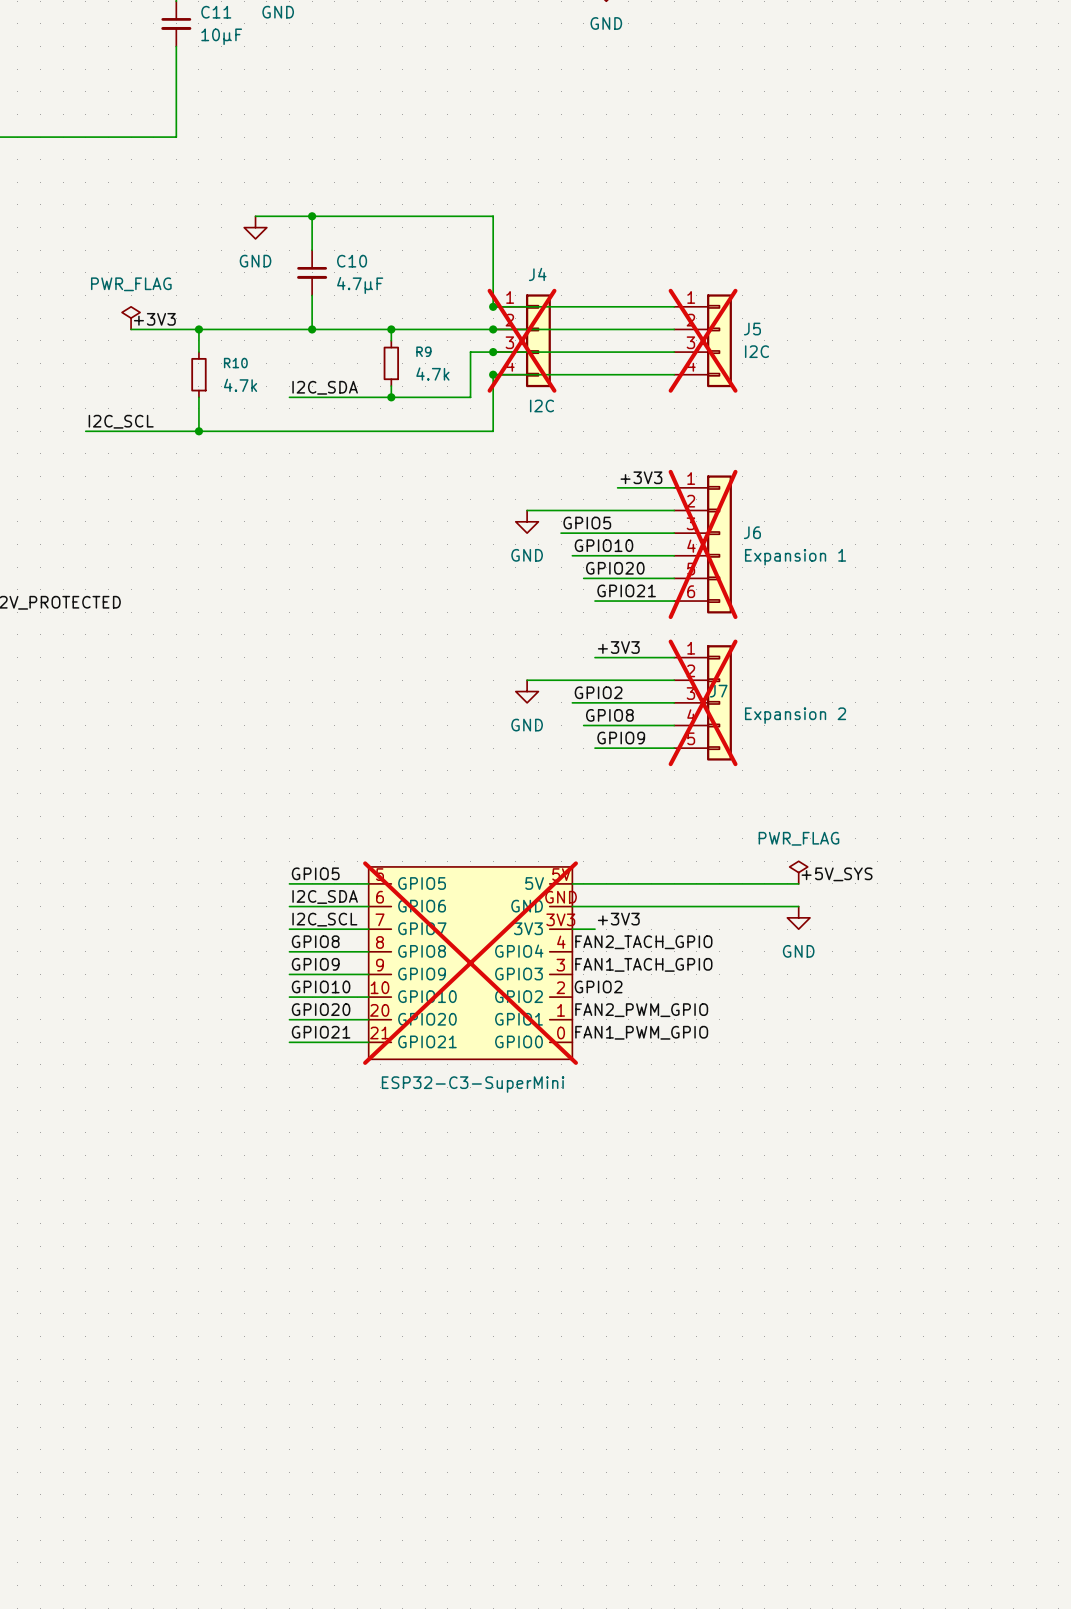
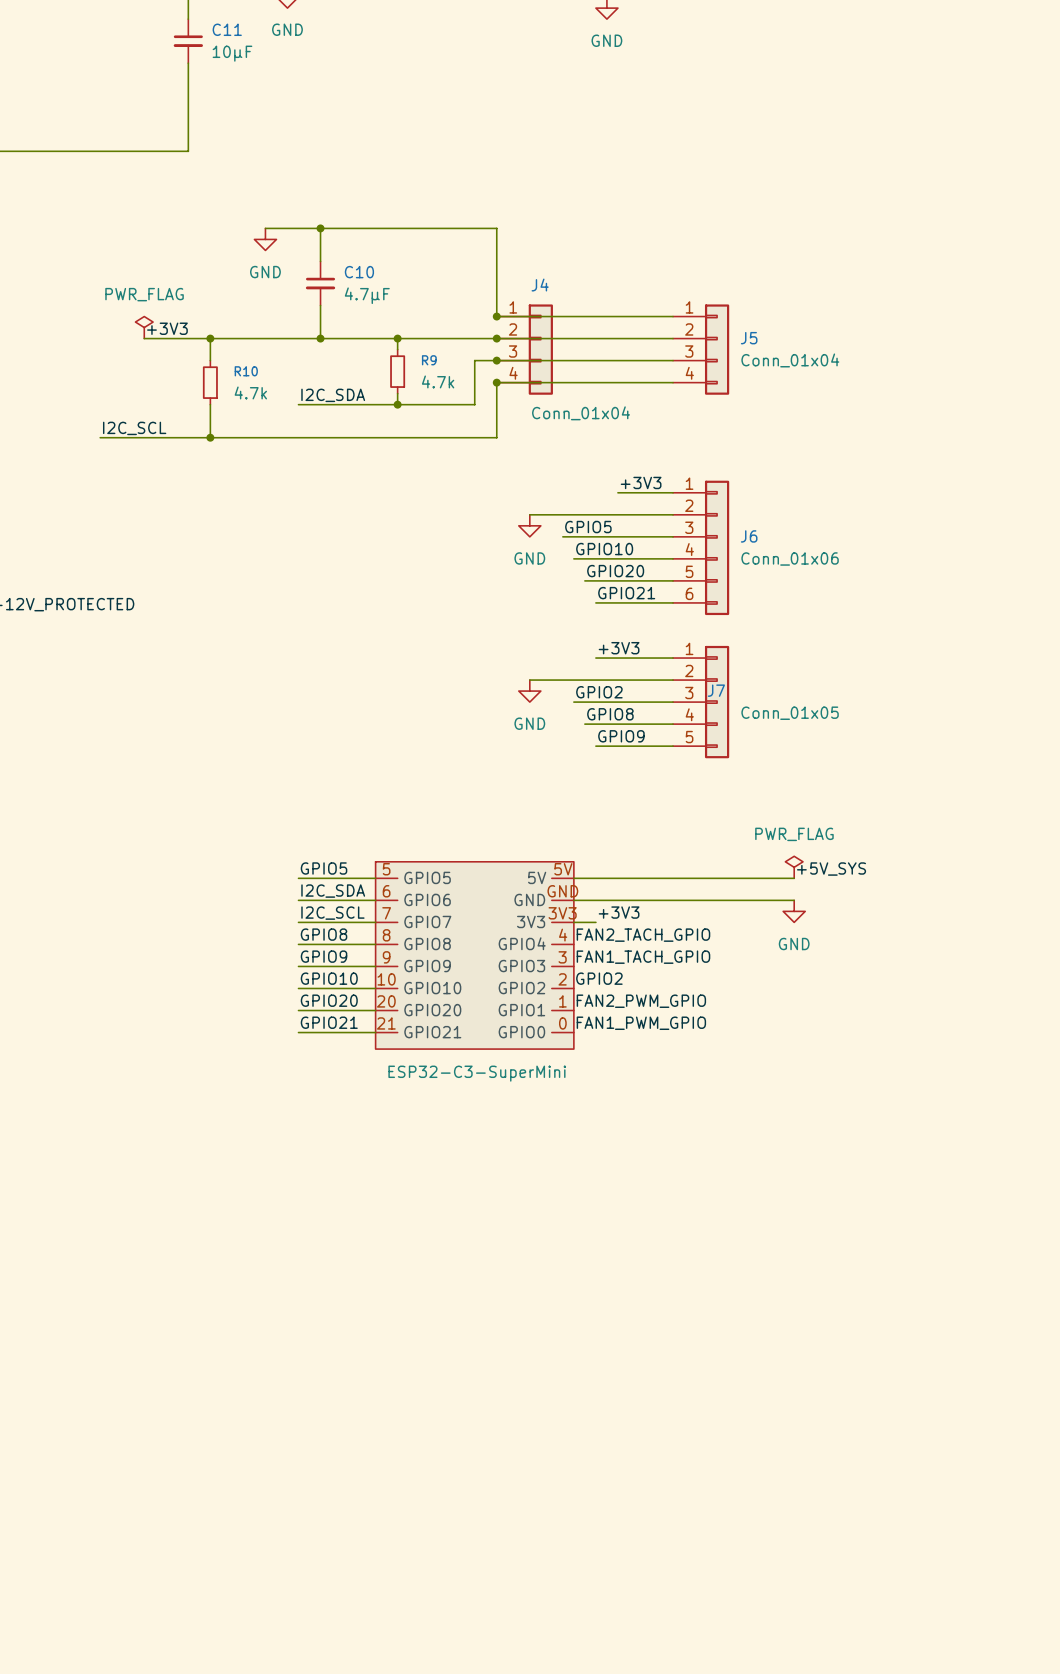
J4 do-not-place cross: (522, 340) -> none
J5 do-not-place cross: (703, 340) -> none
J5 value: I2C (757, 351) -> Conn_01x04 (790, 360)
J4 value: I2C (542, 405) -> Conn_01x04 (581, 413)
J6 do-not-place cross: (703, 544) -> none
J6 value: Expansion 1 (795, 557) -> Conn_01x06 (790, 558)
J7 do-not-place cross: (703, 702) -> none
J7 value: Expansion 2 (795, 715) -> Conn_01x05 (790, 713)
part do-not-place cross: (470, 963) -> none

